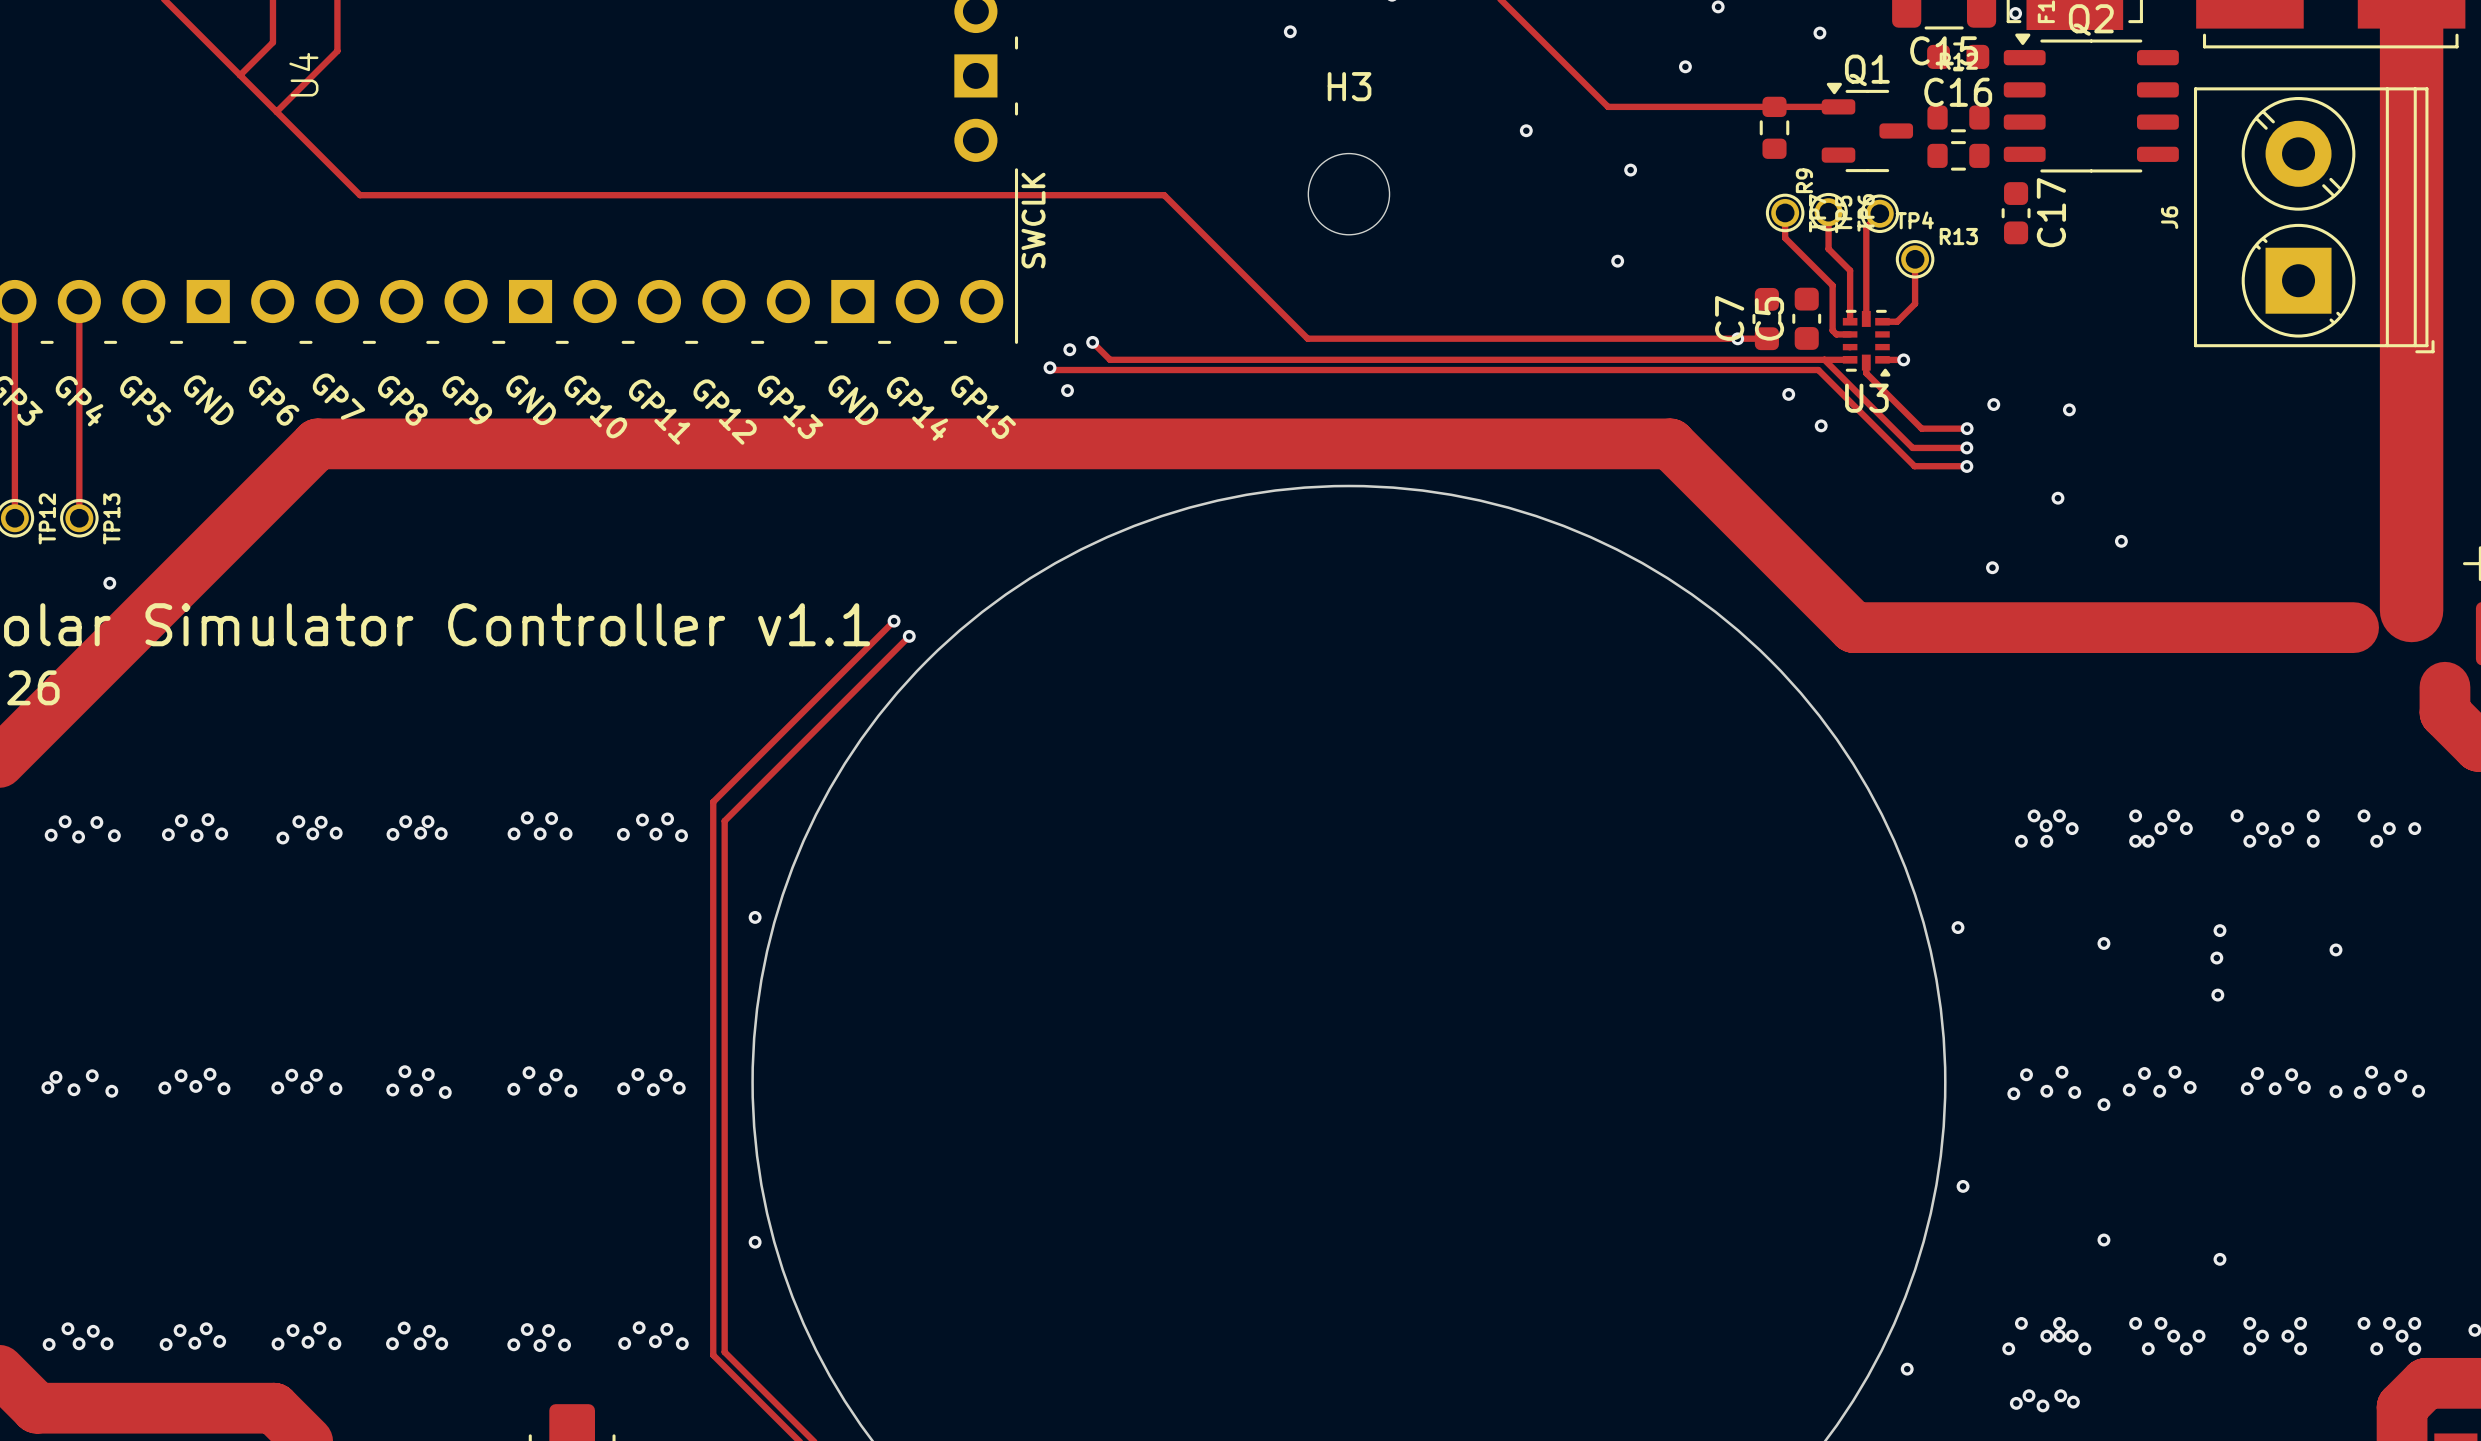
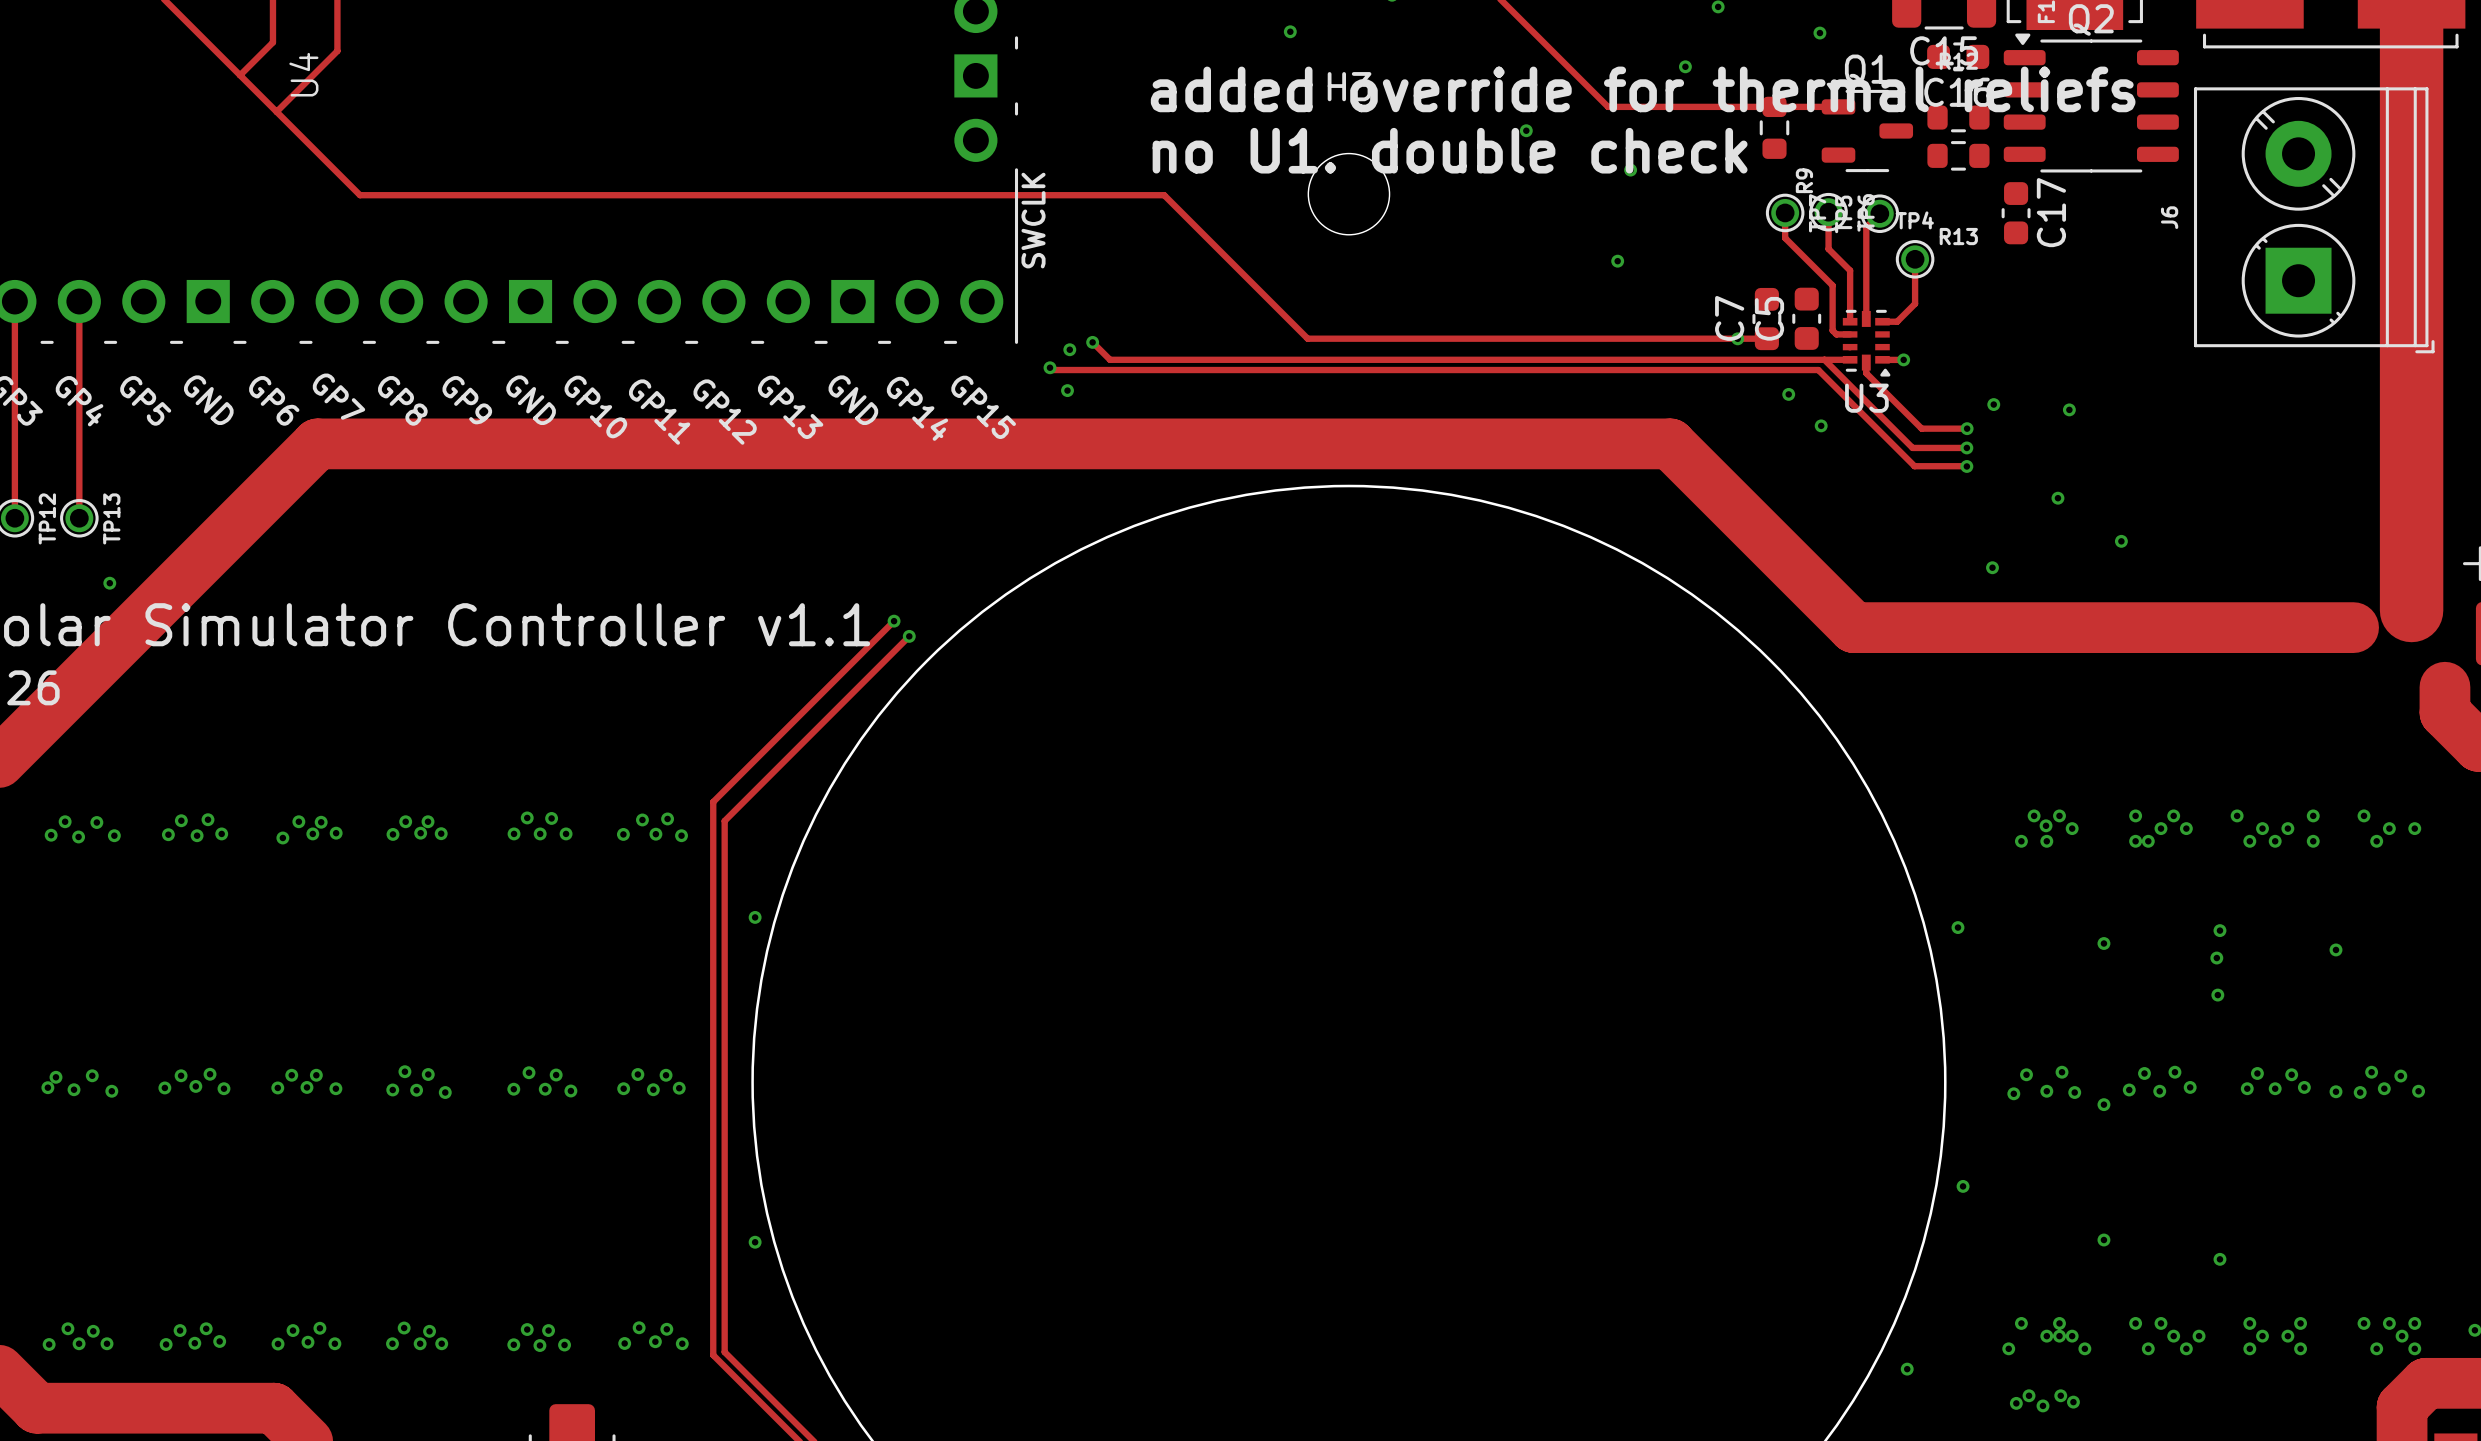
via: (2015, 13) -> none
text: none -> added override for thermal reliefs (1643, 89)
text: none -> no U1. double check (1450, 150)

